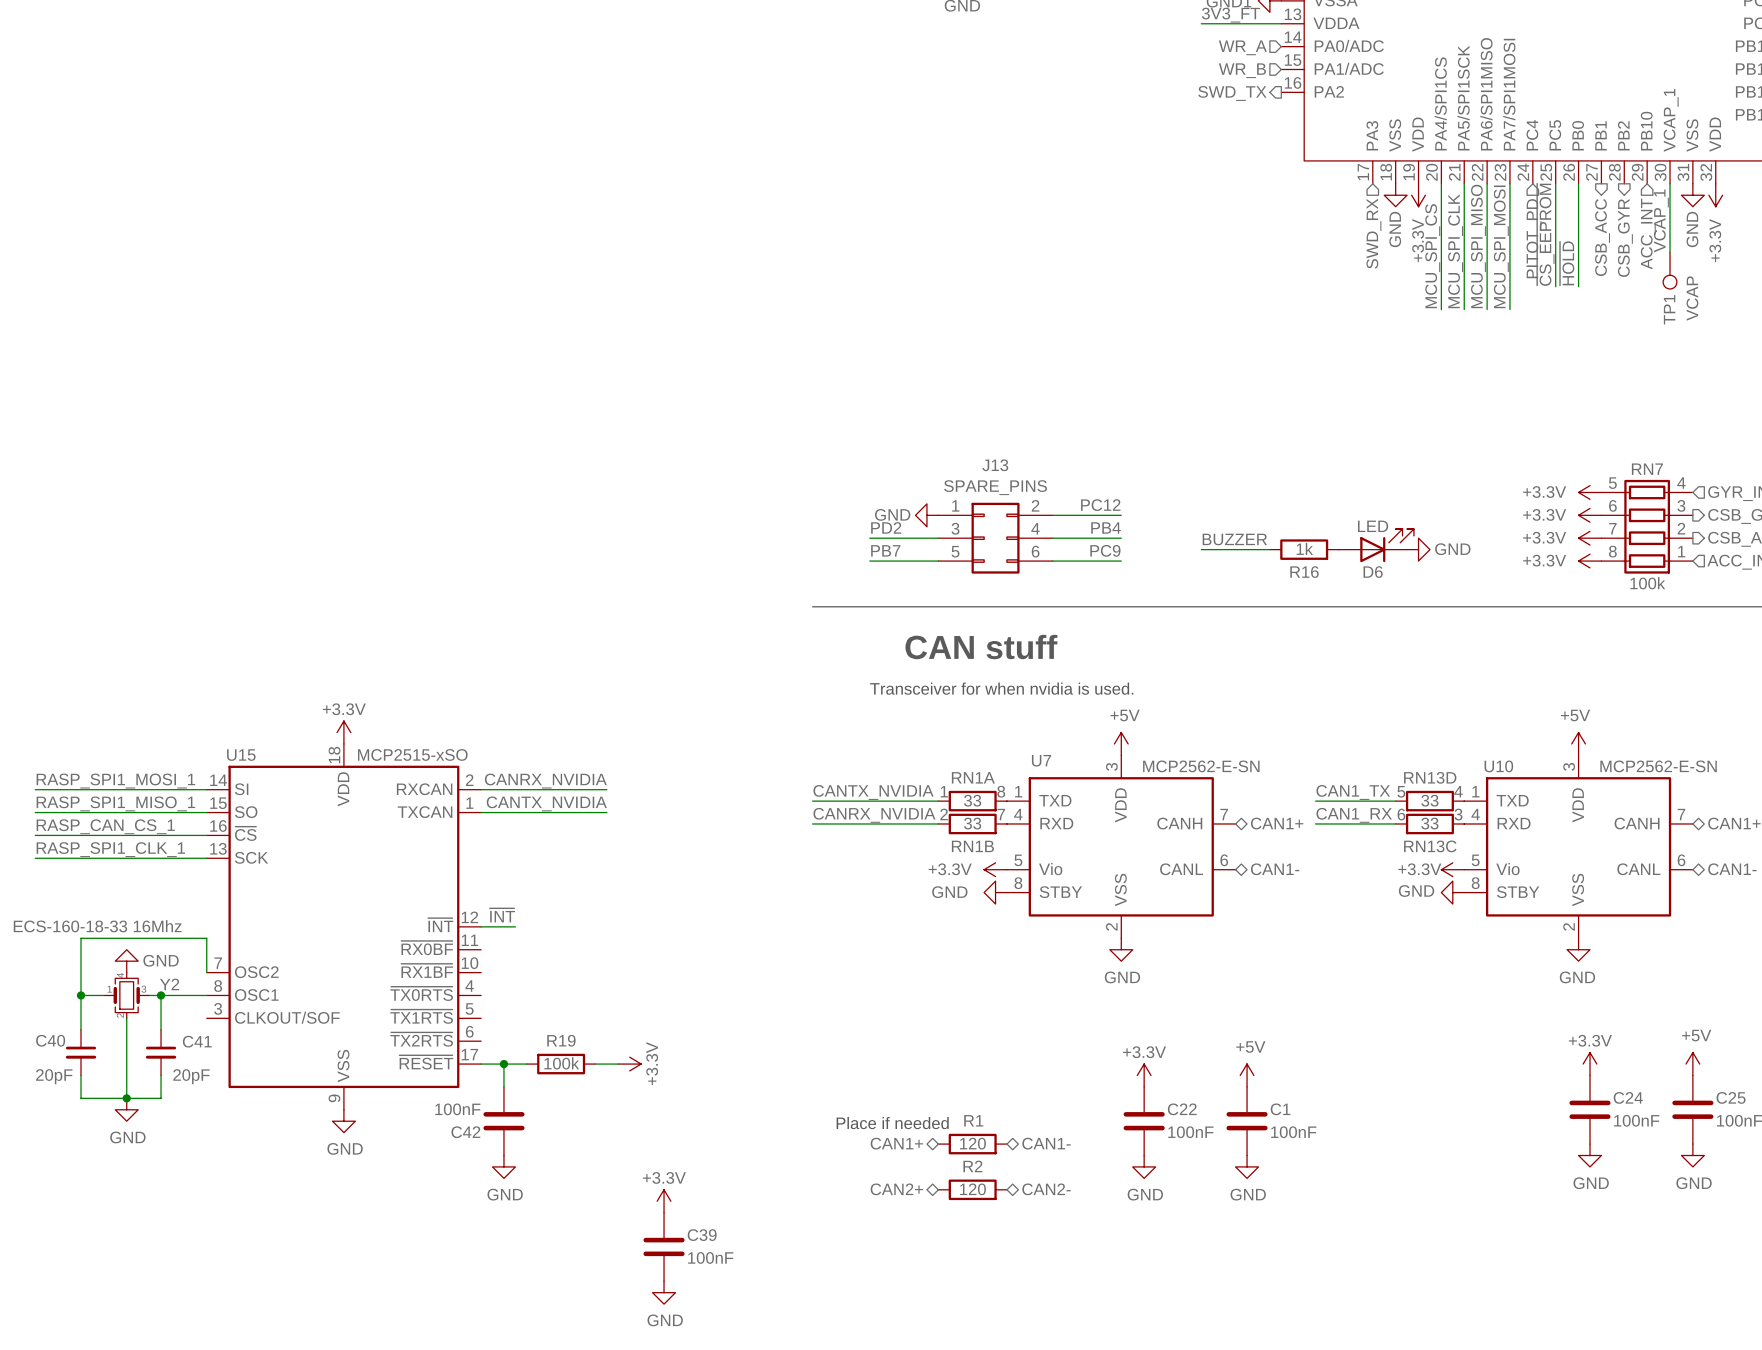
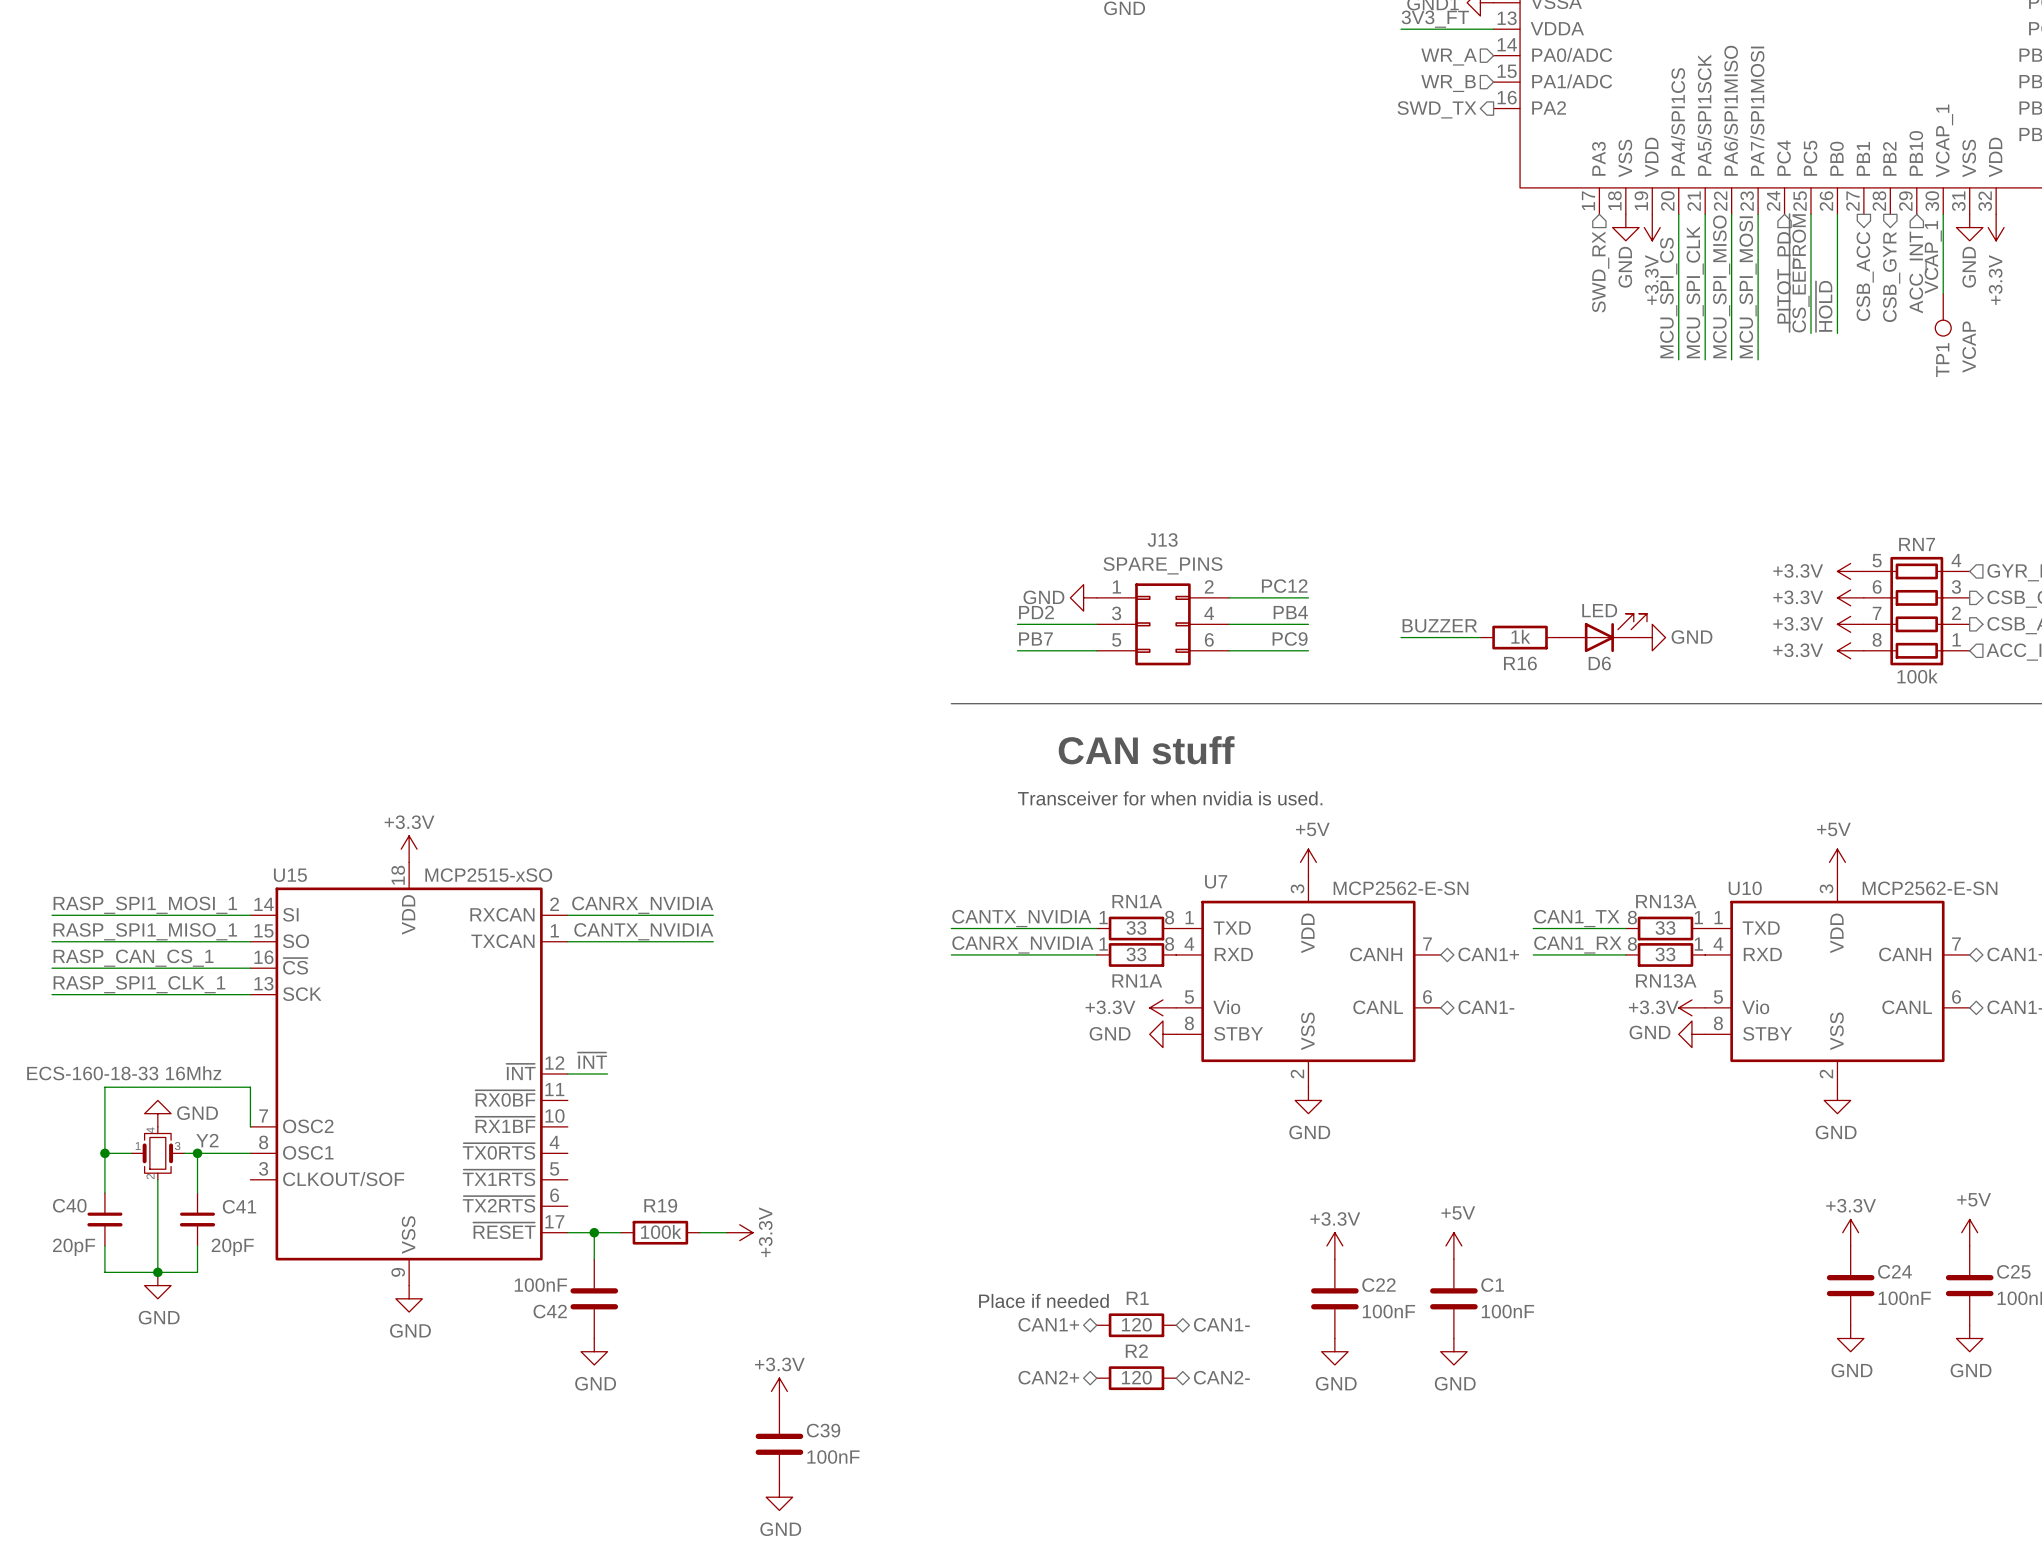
RN13D name: RN13D (1430, 777) -> RN13A (1666, 901)
RN13D pin number: 5 (1401, 791) -> 8 (1632, 917)
RN13D pin number: 4 (1458, 791) -> 1 (1698, 917)
RN1B pin number: 2 (944, 814) -> 1 (1103, 944)
RN1B pin number: 7 (1001, 814) -> 8 (1169, 944)
RN13C pin number: 6 (1401, 814) -> 8 (1632, 944)
RN13C pin number: 3 (1458, 814) -> 1 (1698, 944)
RN1B name: RN1B (972, 846) -> RN1A (1137, 980)
RN13C name: RN13C (1430, 846) -> RN13A (1666, 980)

